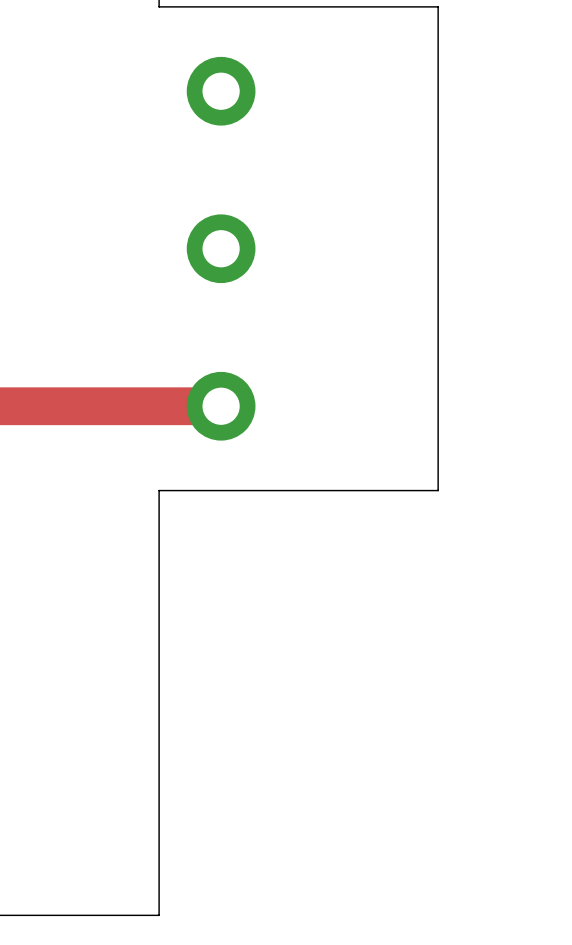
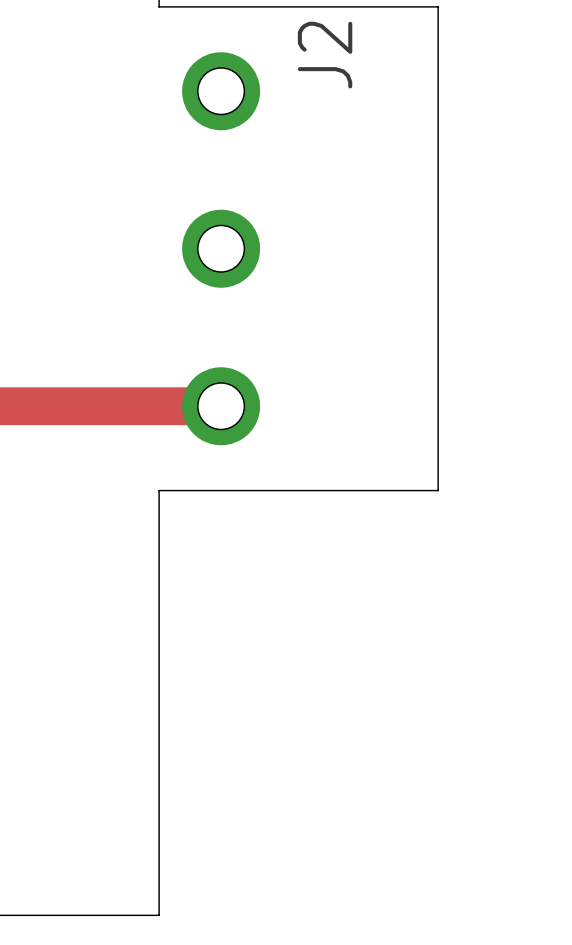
part: (221, 248) -> none
J2: none -> (221, 248)

